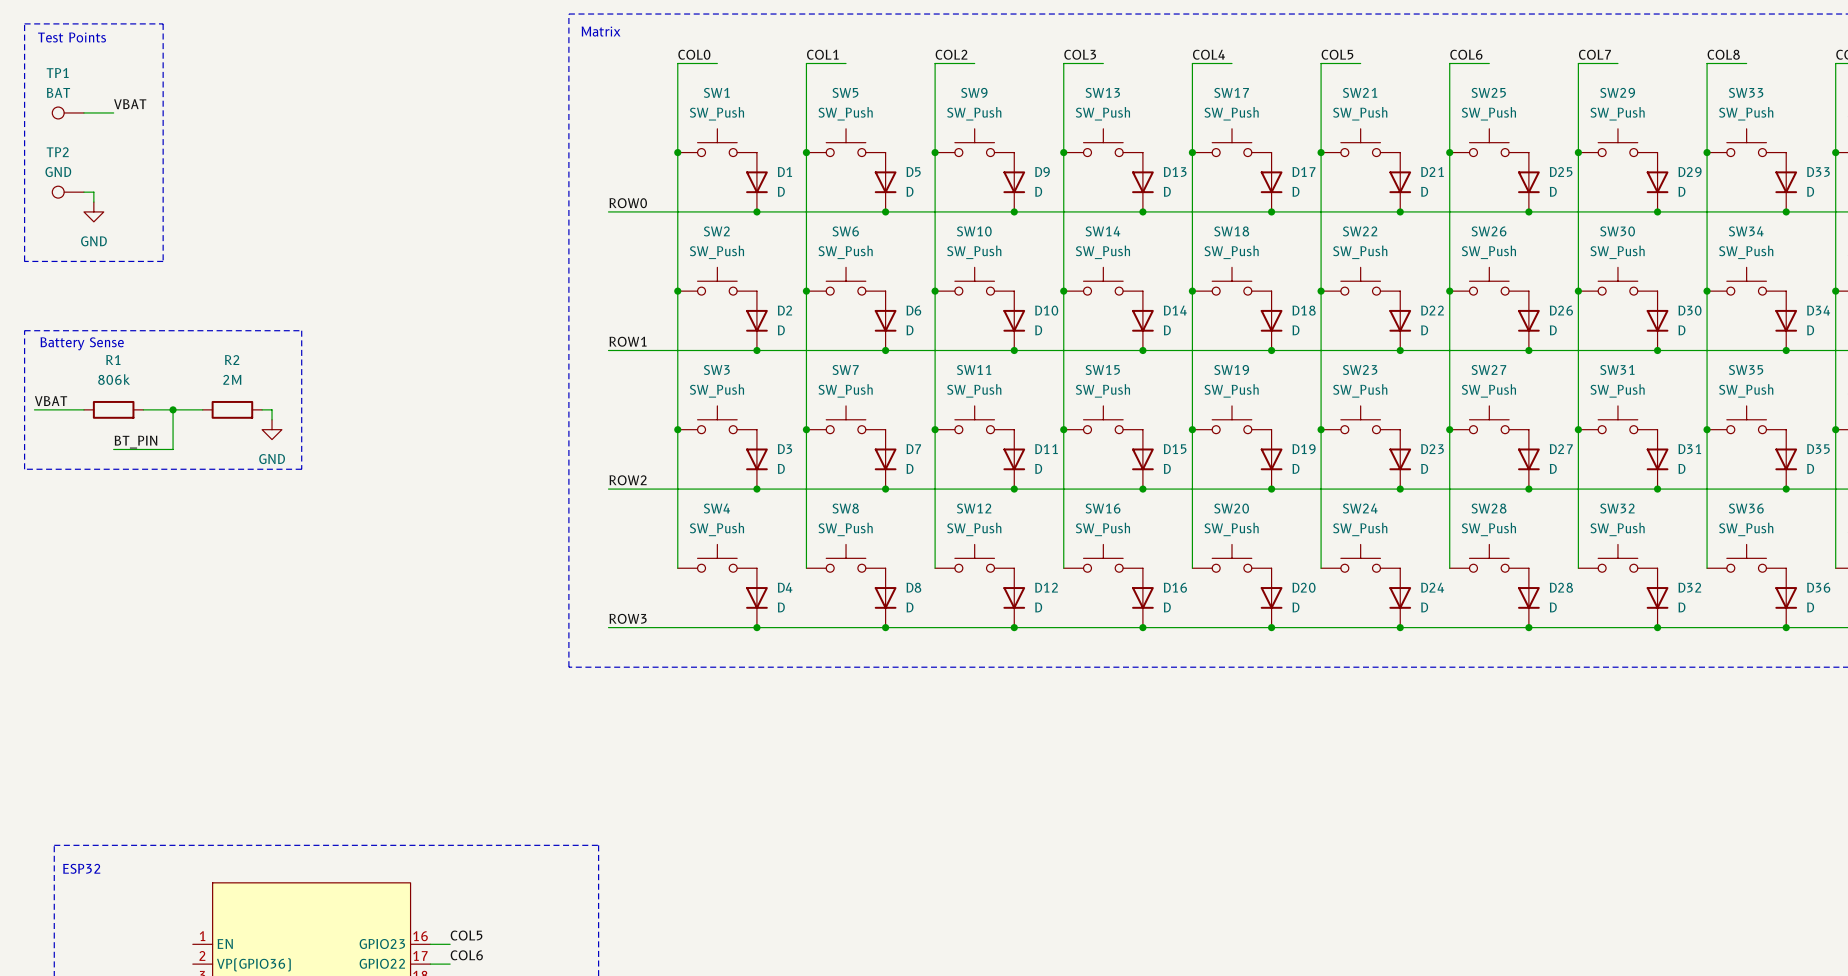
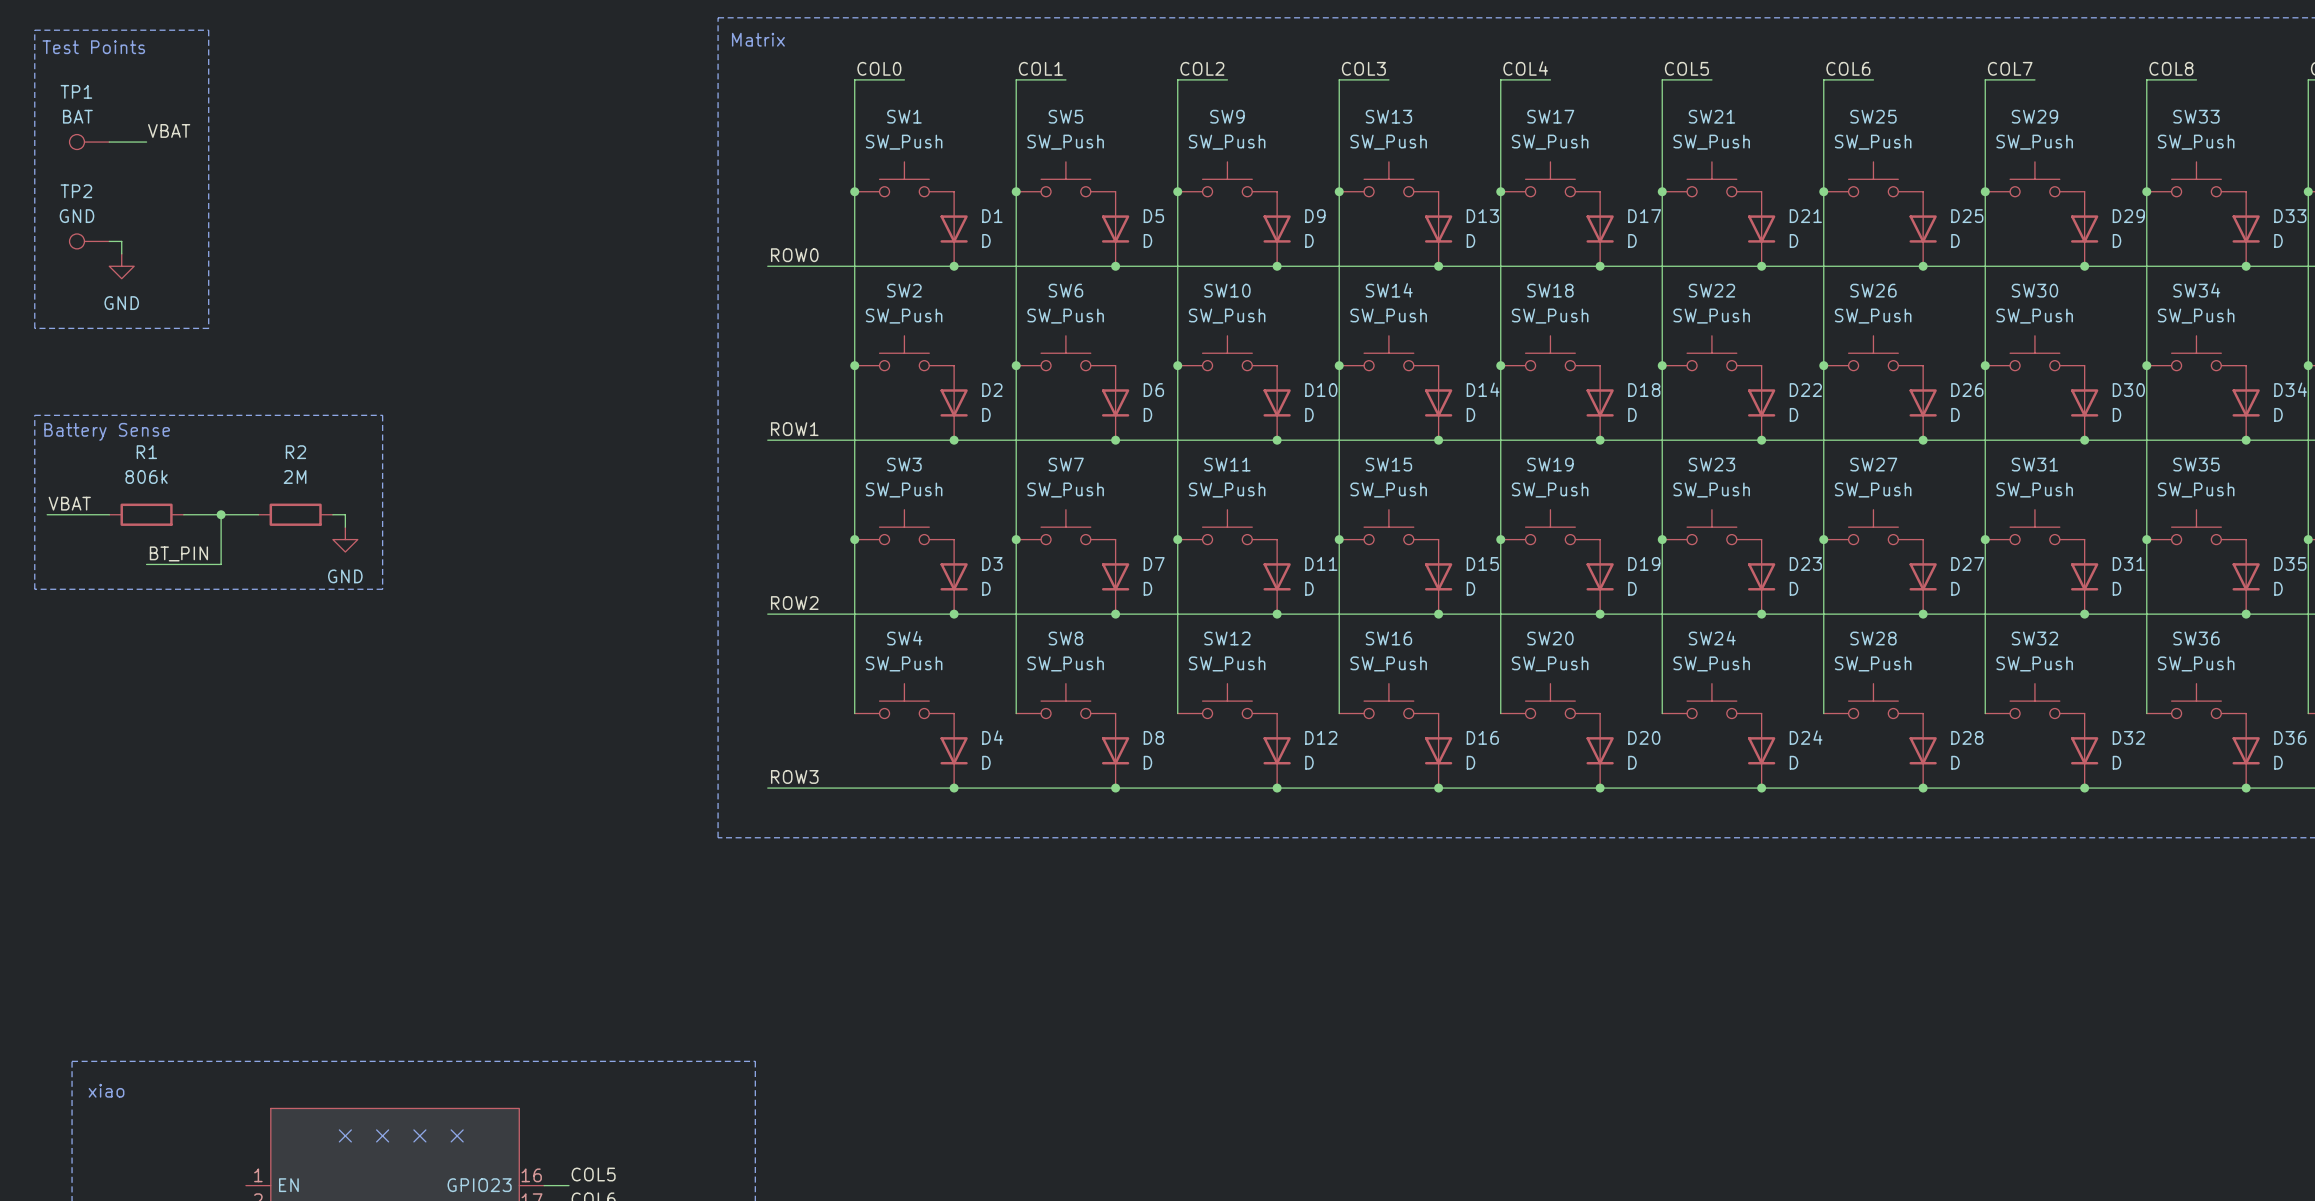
text: ESP32 (81, 868) -> xiao (106, 1090)
no-connect mark: none -> (345, 1135)
no-connect mark: none -> (382, 1135)
no-connect mark: none -> (419, 1135)
no-connect mark: none -> (457, 1135)

